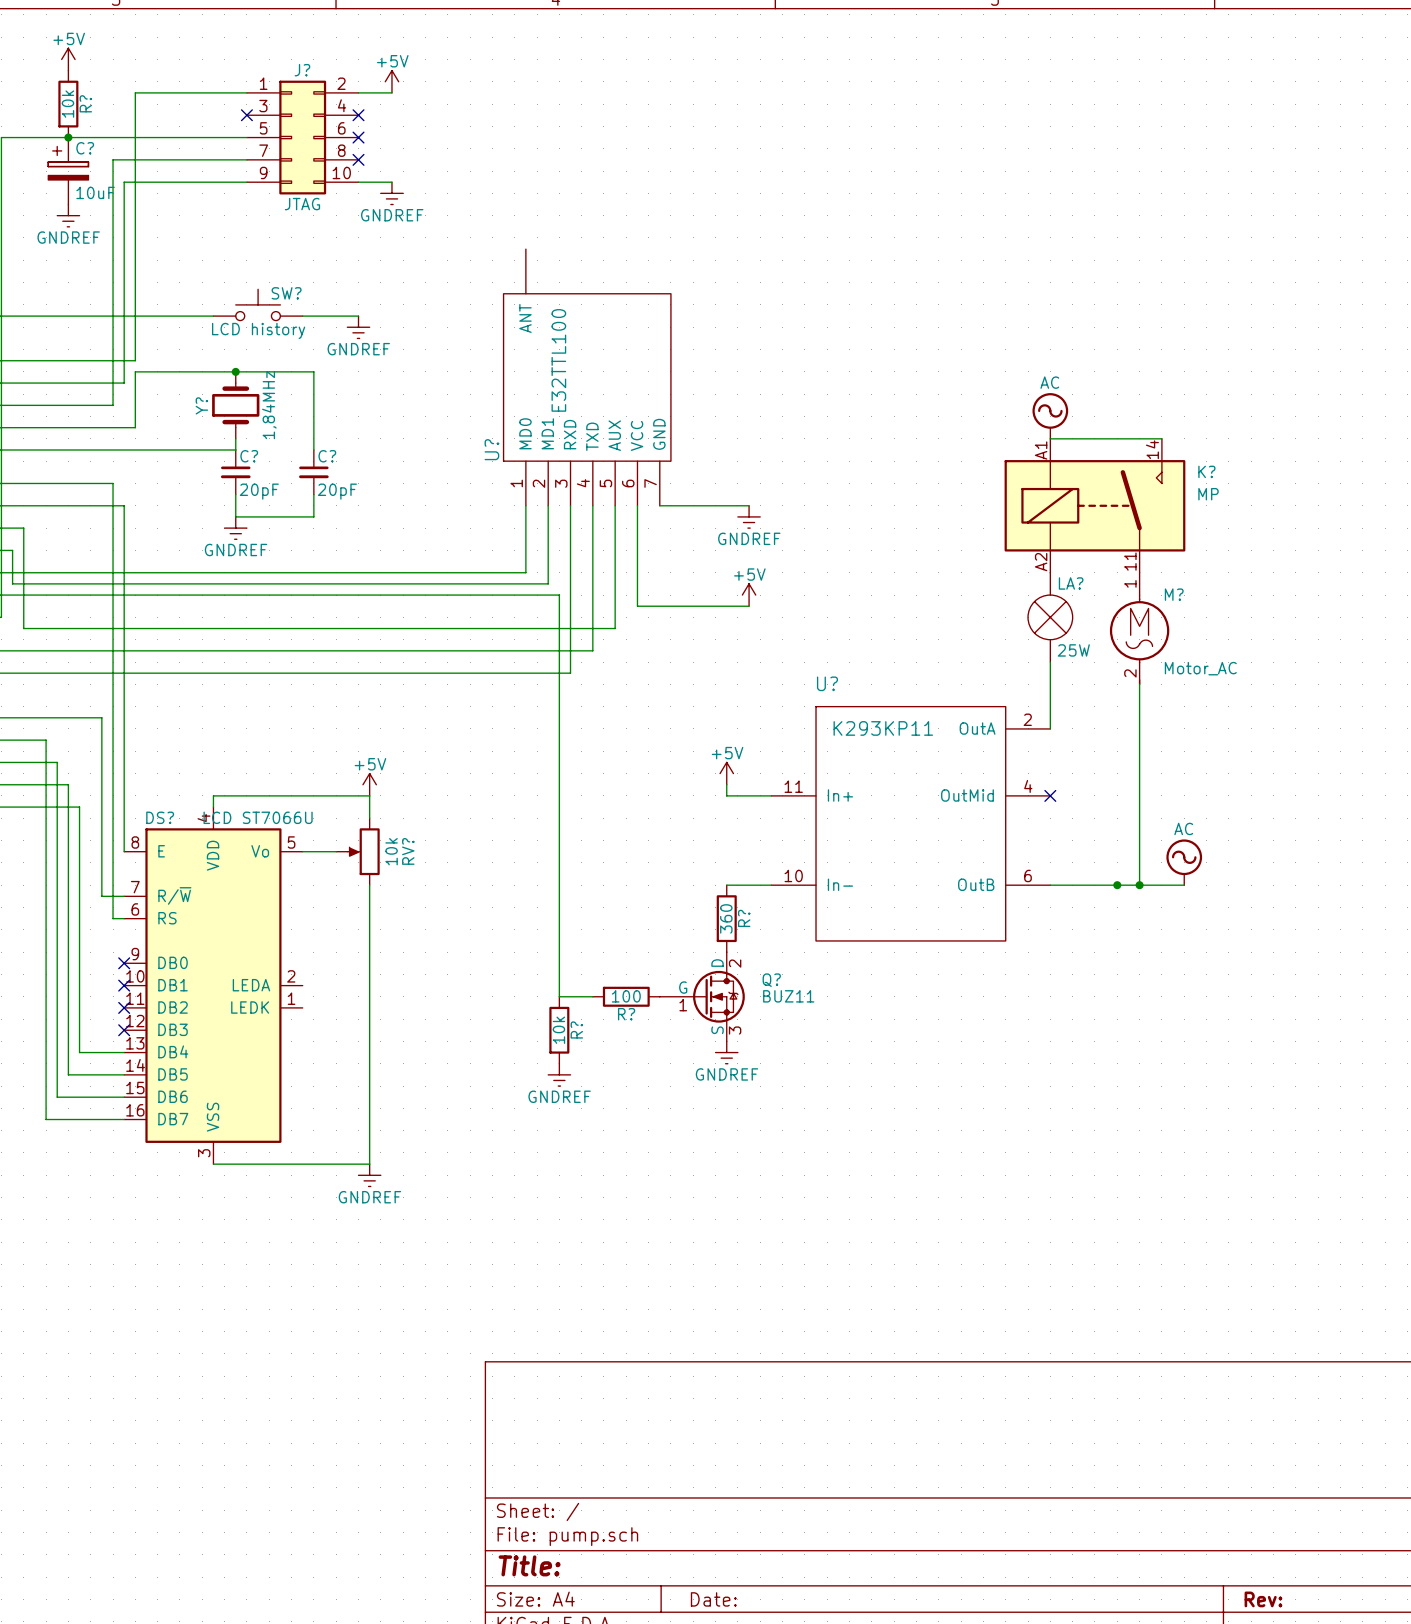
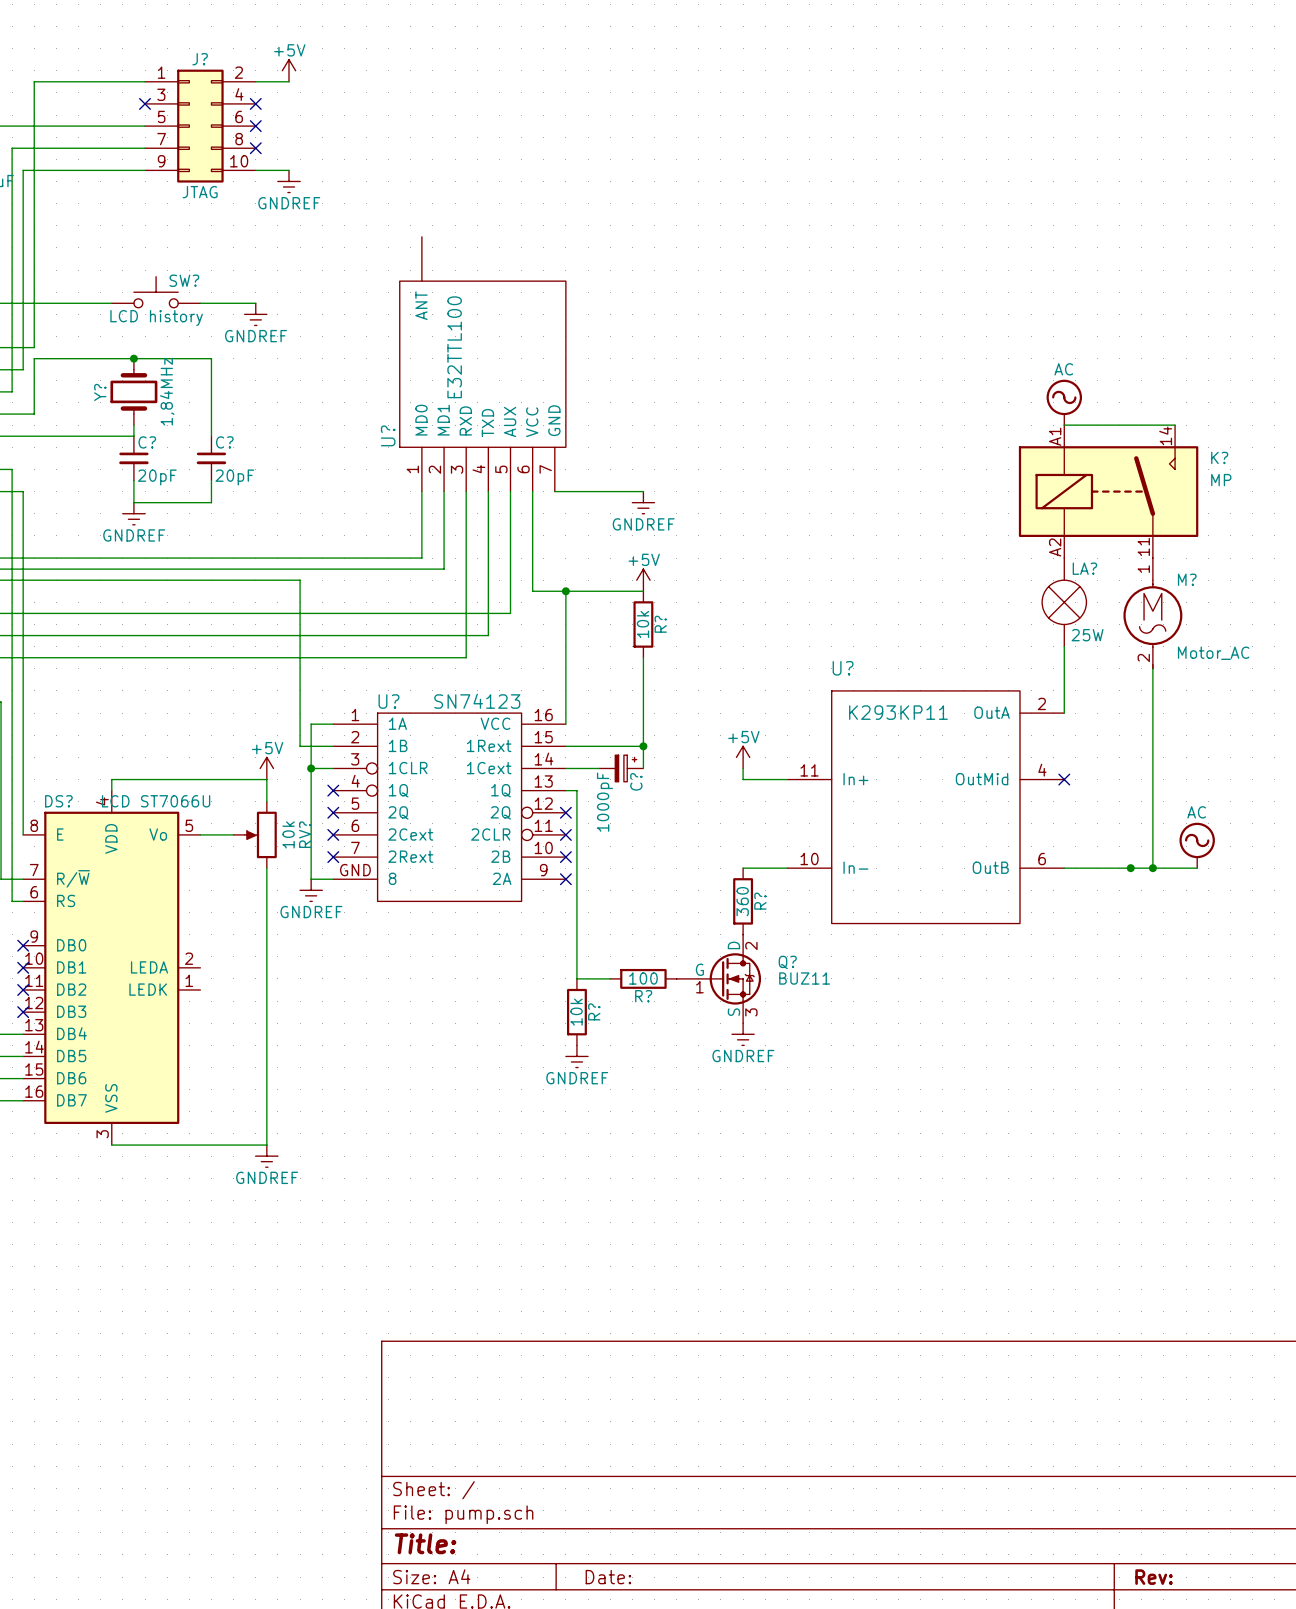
power symbol position: AC (1050, 415) -> AC (1064, 402)
wire: (1050, 438) (1161, 438) -> (1064, 425) (1175, 425)
K? position: (1094, 505) -> (1108, 491)
wire: (403, 595) (559, 595) (559, 996) (592, 996) -> (300, 580) (300, 746) (333, 746)
wire: none -> (565, 591) (565, 724)
junction: none -> (565, 591)
LA? position: (1050, 617) -> (1064, 602)
M? position: (1139, 628) -> (1152, 613)
R?: none -> 10k (643, 624)
wire: (1050, 662) (1050, 728) -> (1064, 646) (1064, 713)
wire: none -> (643, 657) (643, 768)
wire: (1139, 684) (1139, 885) -> (1152, 668) (1152, 868)
wire: none -> (333, 724) (311, 724) (311, 879) (333, 879)
wire: none -> (565, 746) (643, 746)
junction: none -> (643, 746)
power symbol position: +5V (726, 773) -> +5V (743, 757)
wire: none -> (311, 768) (333, 768)
junction: none -> (311, 768)
wire: none -> (565, 768) (599, 768)
wire: (726, 784) (726, 795) (771, 795) -> (743, 768) (743, 779) (787, 779)
C?: none -> 1000pF (621, 768)
no-connect mark: (1050, 795) -> none
no-connect mark: none -> (1064, 779)
no-connect mark: none -> (333, 790)
wire: none -> (565, 790) (576, 790) (576, 978) (610, 978)
U?: none -> SN74123 (449, 807)
U? position: (910, 823) -> (925, 807)
no-connect mark: none -> (333, 812)
no-connect mark: none -> (565, 812)
no-connect mark: none -> (333, 834)
no-connect mark: none -> (565, 834)
power symbol position: AC (1184, 862) -> AC (1197, 845)
no-connect mark: none -> (333, 857)
no-connect mark: none -> (565, 857)
wire: (726, 885) (771, 885) -> (743, 868) (787, 868)
wire: (1050, 885) (1173, 885) -> (1075, 868) (1197, 868)
junction: (1117, 885) -> none
junction: (1139, 885) -> none
junction: none -> (1130, 868)
junction: none -> (1152, 868)
no-connect mark: none -> (565, 879)
power symbol: none -> GNDREF (311, 890)
R? position: (726, 918) -> (743, 901)
R? position: (626, 996) -> (643, 978)
Q? position: (702, 996) -> (718, 978)
R? position: (559, 1030) -> (576, 1012)
power symbol position: GNDREF (726, 1052) -> GNDREF (576, 1056)
power symbol: none -> GNDREF (743, 1034)
power symbol: GNDREF (559, 1074) -> none

